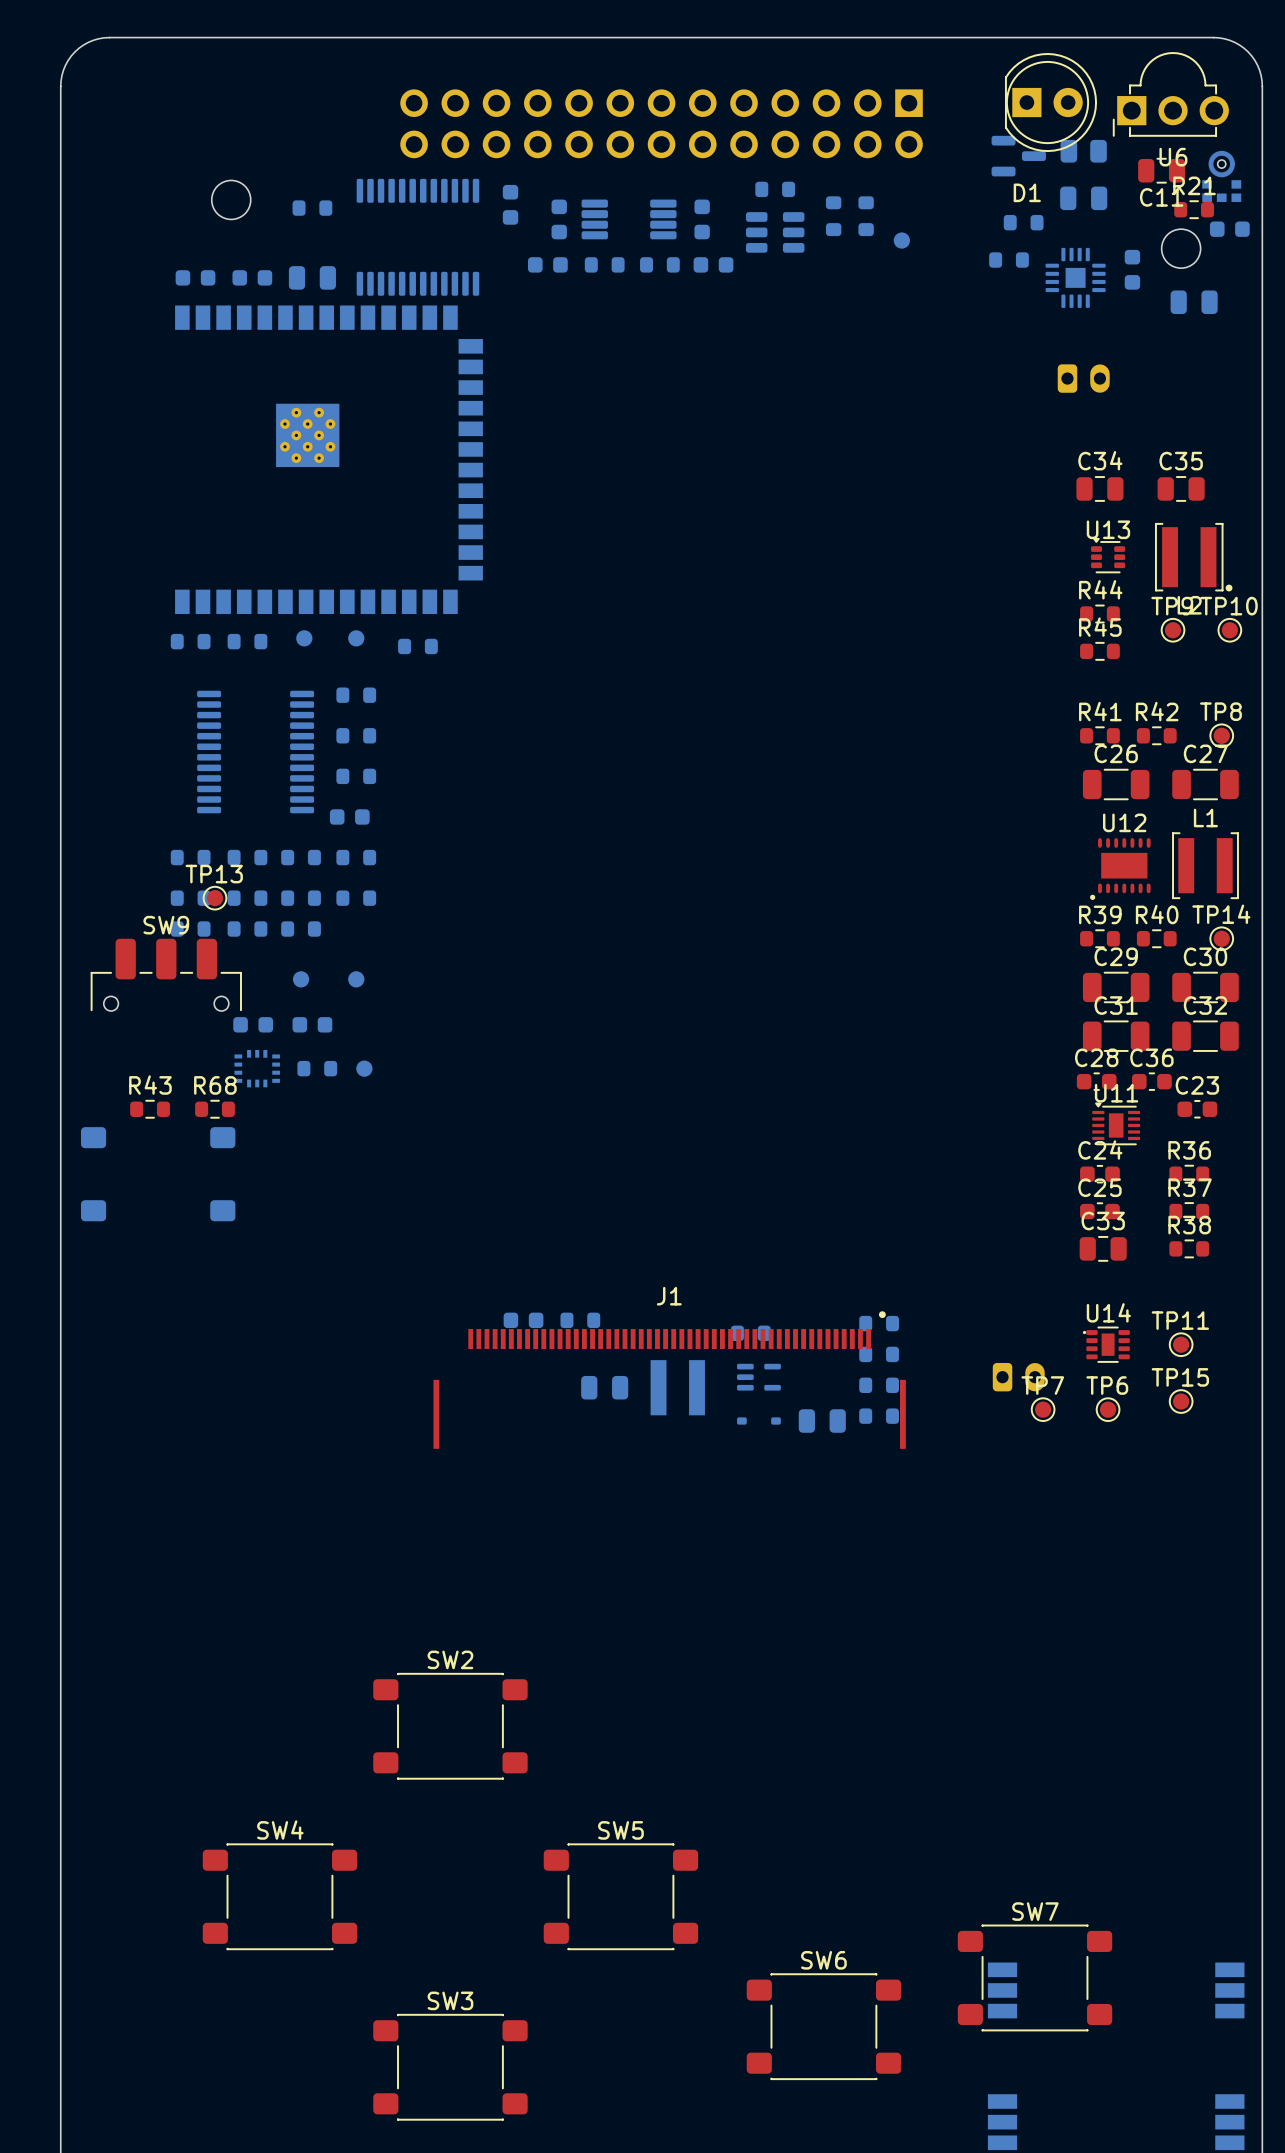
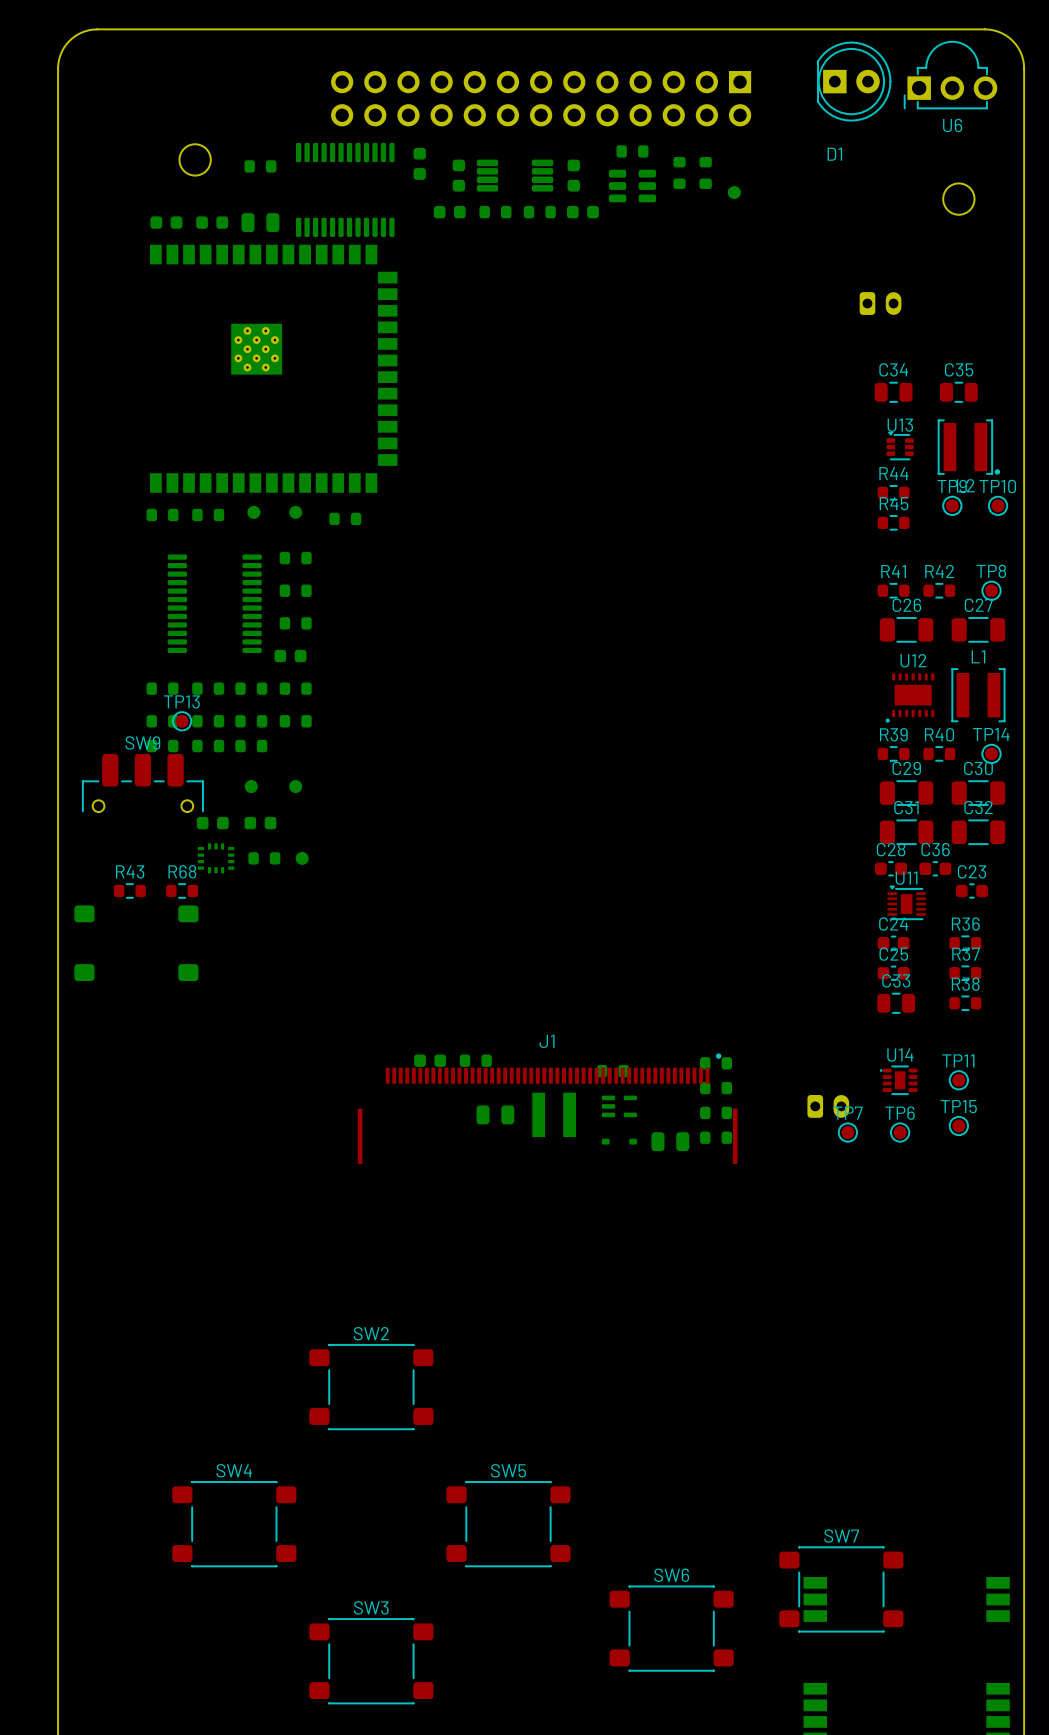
part: (1083, 151) -> none
part: (1018, 156) -> none
C11: (1161, 170) -> none
part: (1221, 176) -> none
part: (1083, 198) -> none
R21: (1194, 209) -> none
part: (1023, 222) -> none
part: (1229, 229) -> none
part: (1009, 260) -> none
part: (1132, 269) -> none
part: (1075, 277) -> none
part: (1194, 302) -> none

